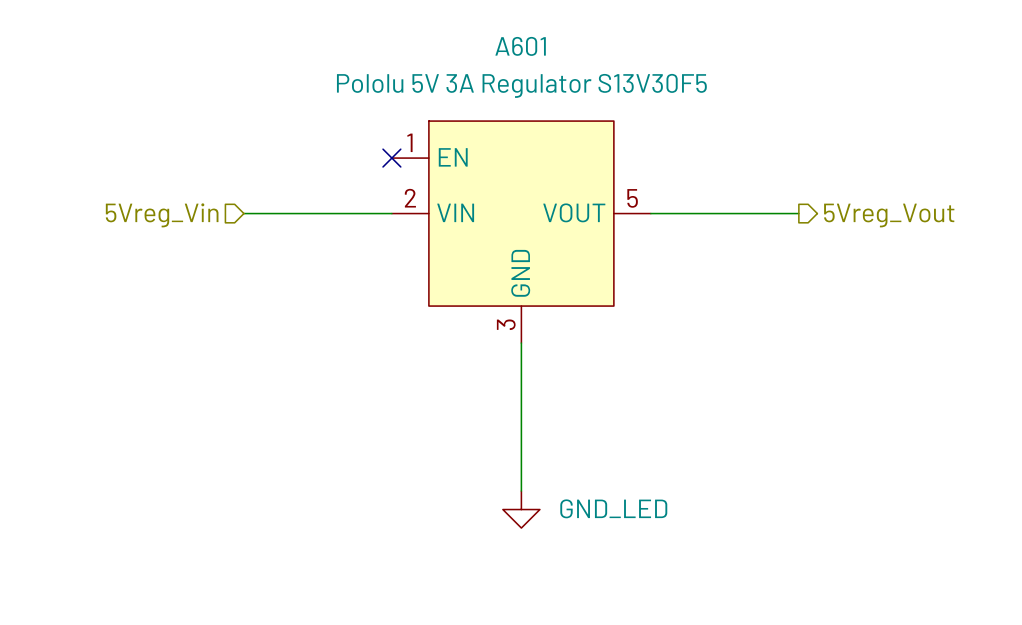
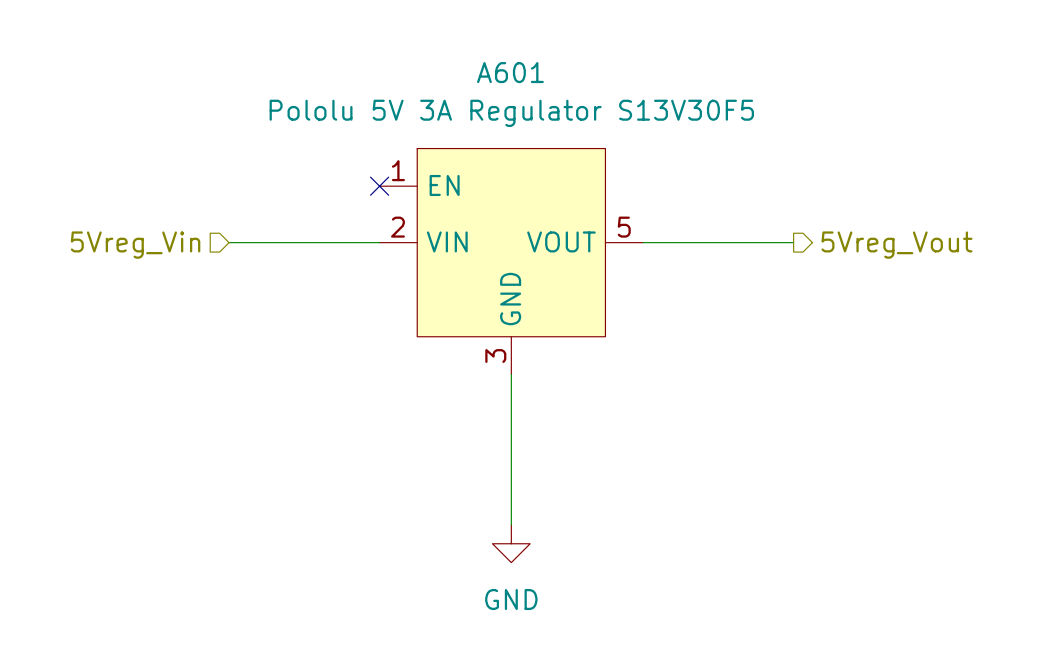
power symbol: GND_LED (521, 509) -> GND (511, 543)

